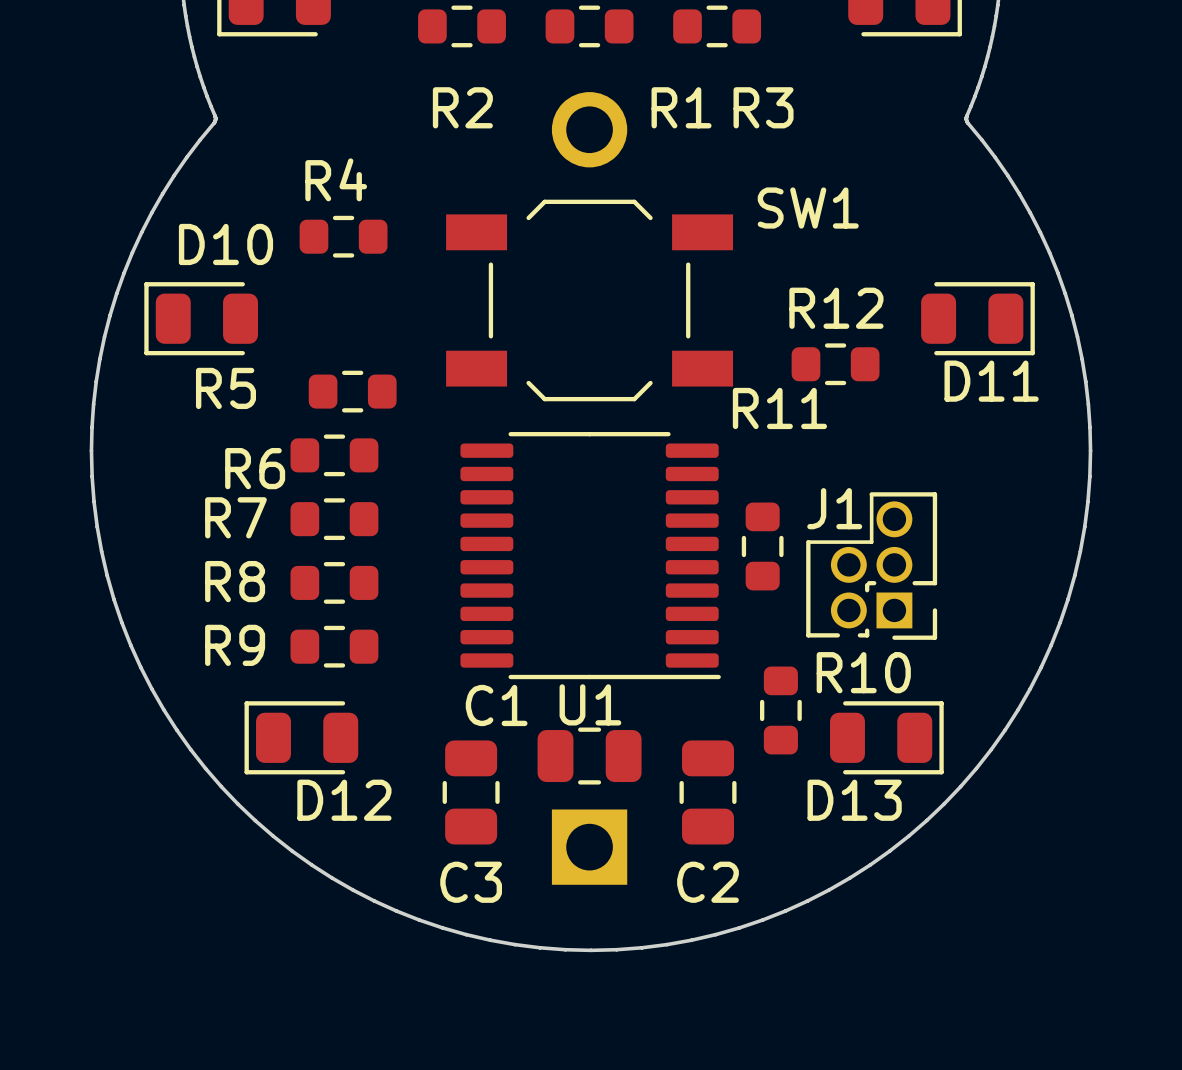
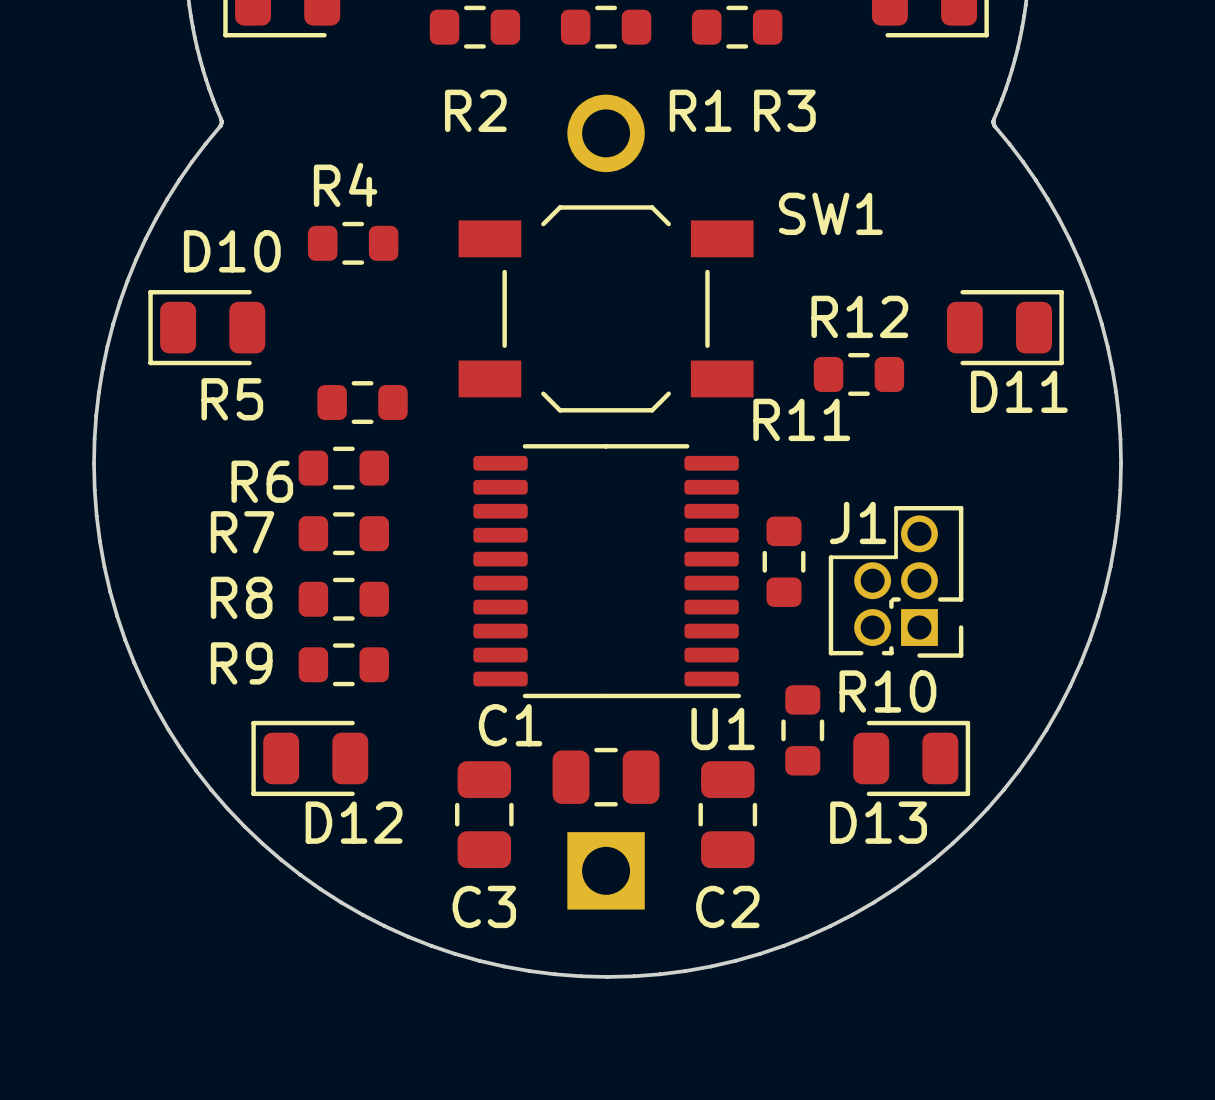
U1 name position: U1 (590, 704) -> U1 (723, 728)

